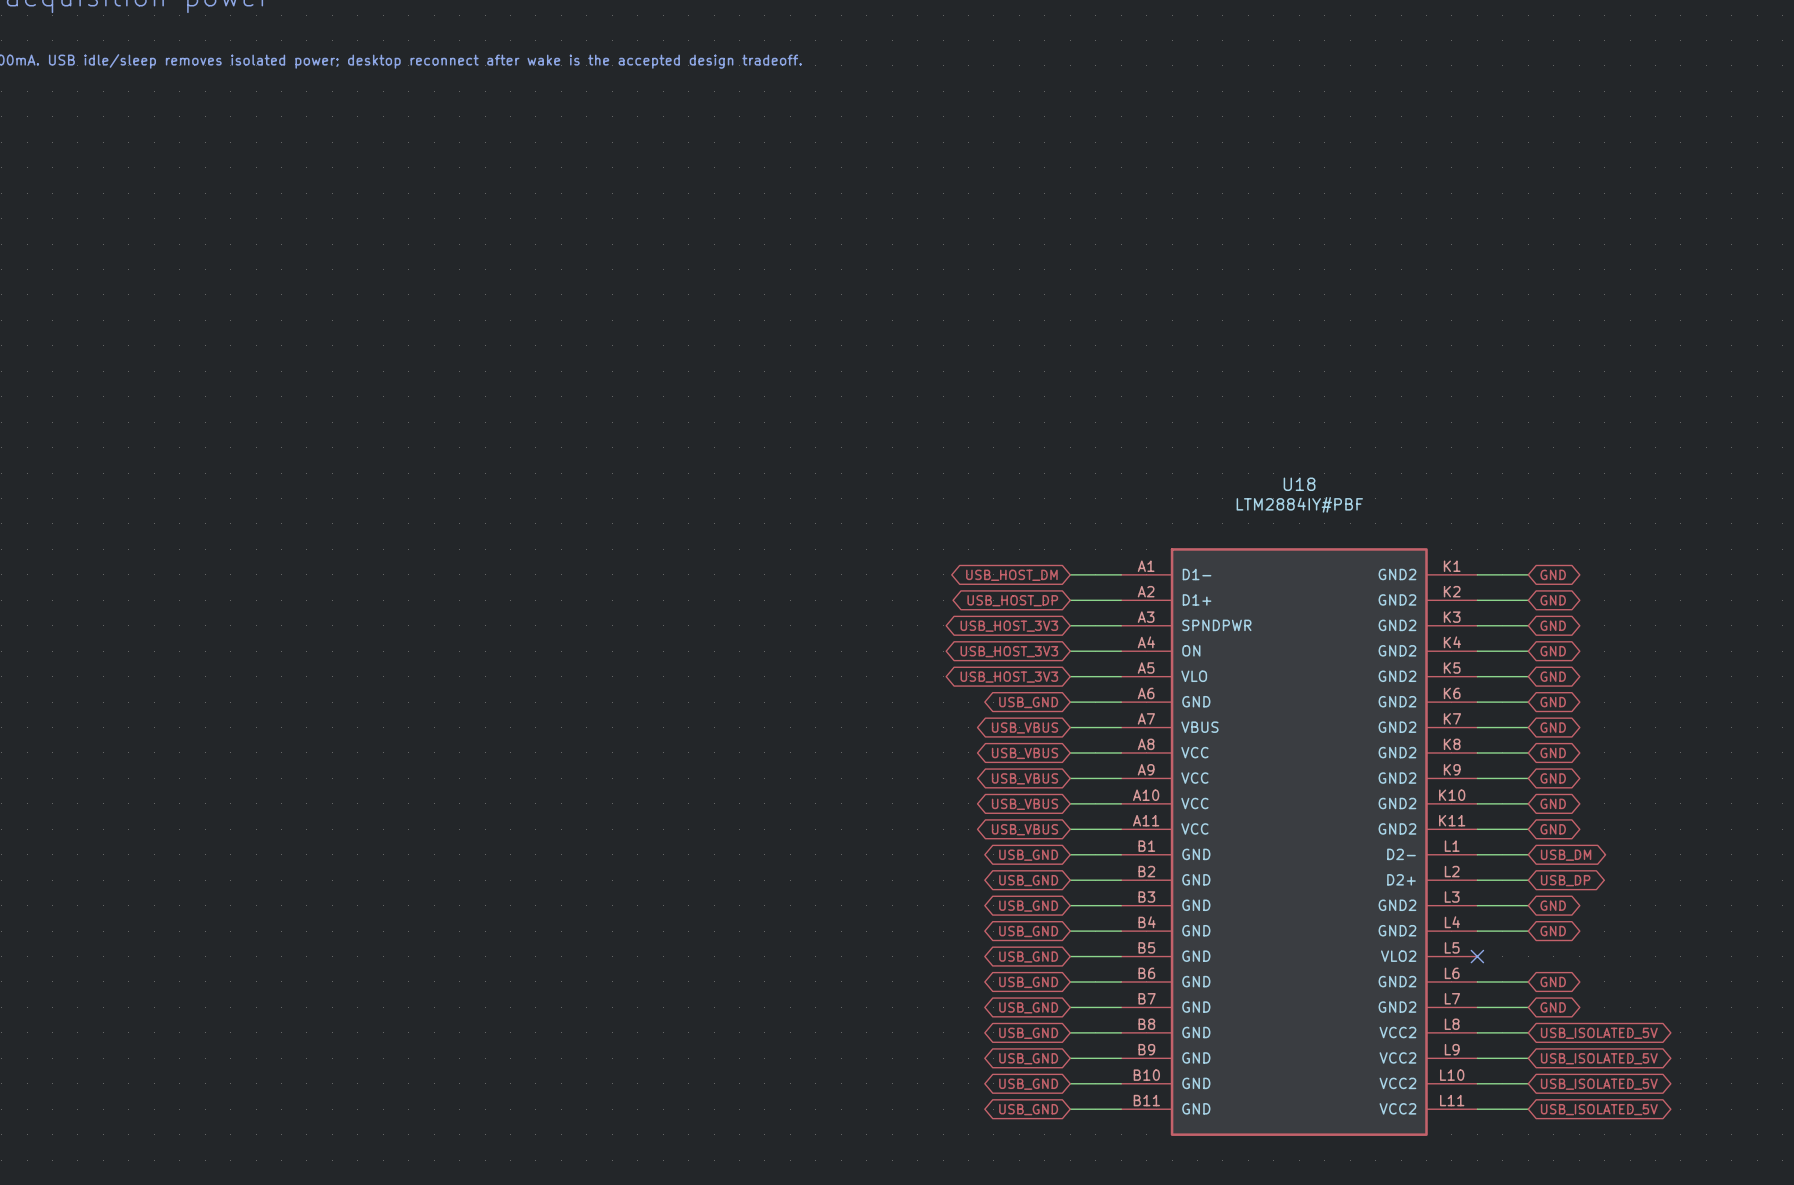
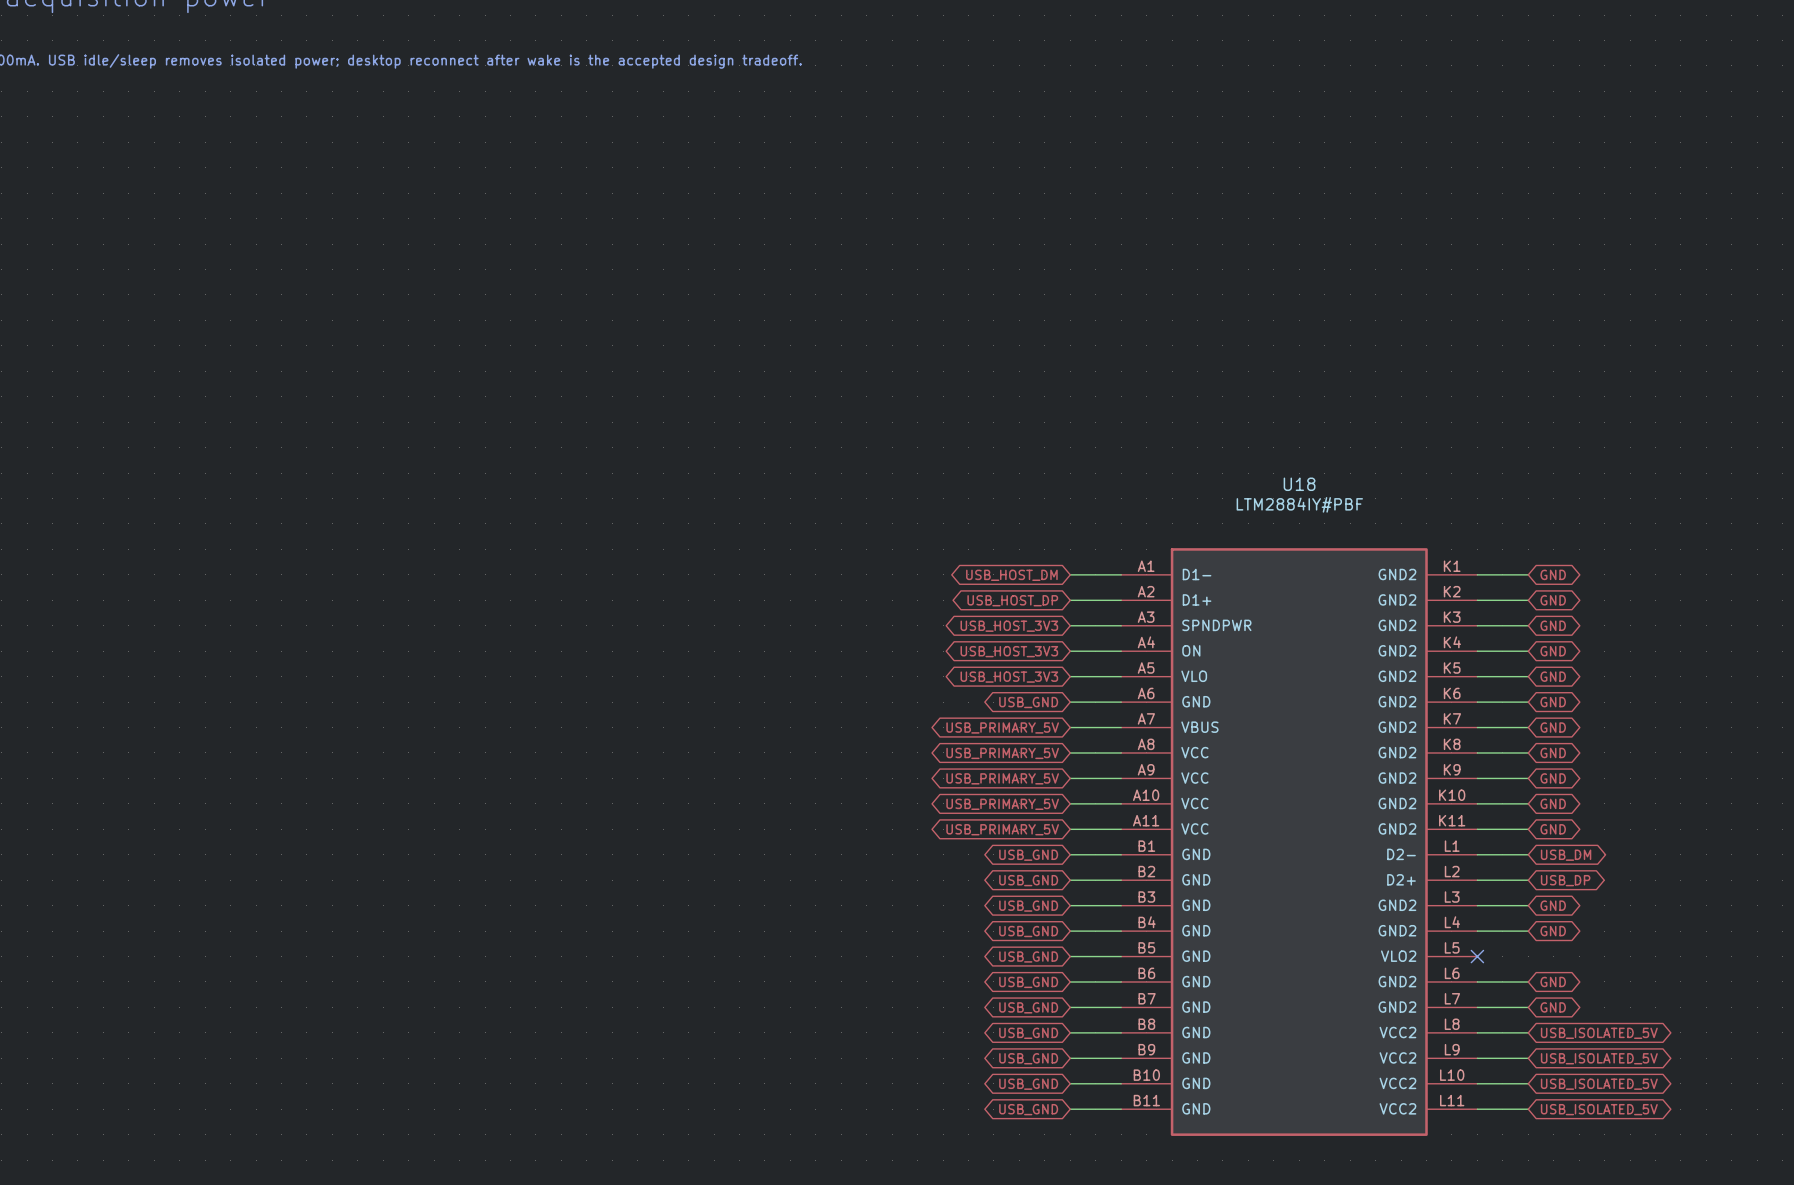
global label: USB_VBUS (1025, 727) -> USB_PRIMARY_5V (1002, 727)
global label: USB_VBUS (1025, 753) -> USB_PRIMARY_5V (1002, 753)
global label: USB_VBUS (1025, 778) -> USB_PRIMARY_5V (1002, 778)
global label: USB_VBUS (1025, 804) -> USB_PRIMARY_5V (1002, 804)
global label: USB_VBUS (1025, 829) -> USB_PRIMARY_5V (1002, 829)

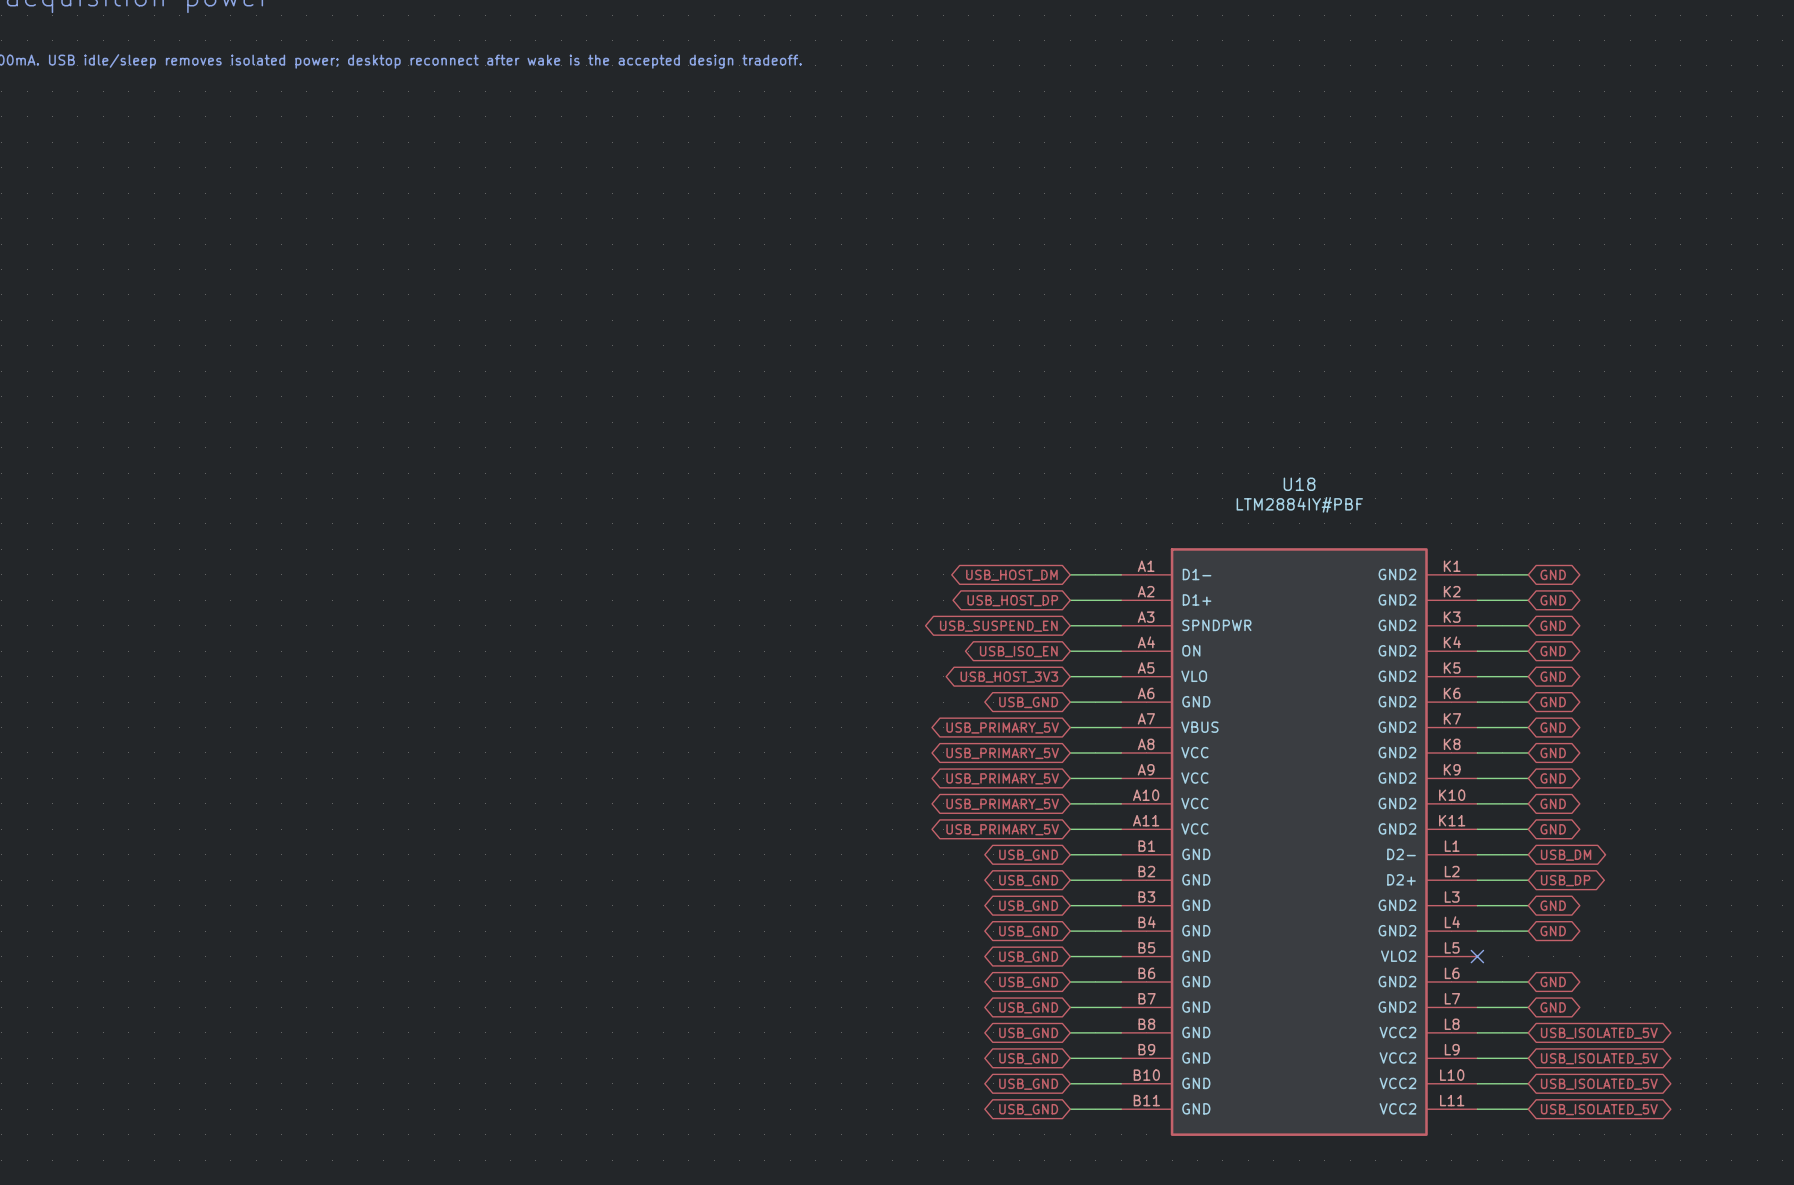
global label: USB_HOST_3V3 (1009, 626) -> USB_SUSPEND_EN (998, 626)
global label: USB_HOST_3V3 (1009, 651) -> USB_ISO_EN (1018, 651)

